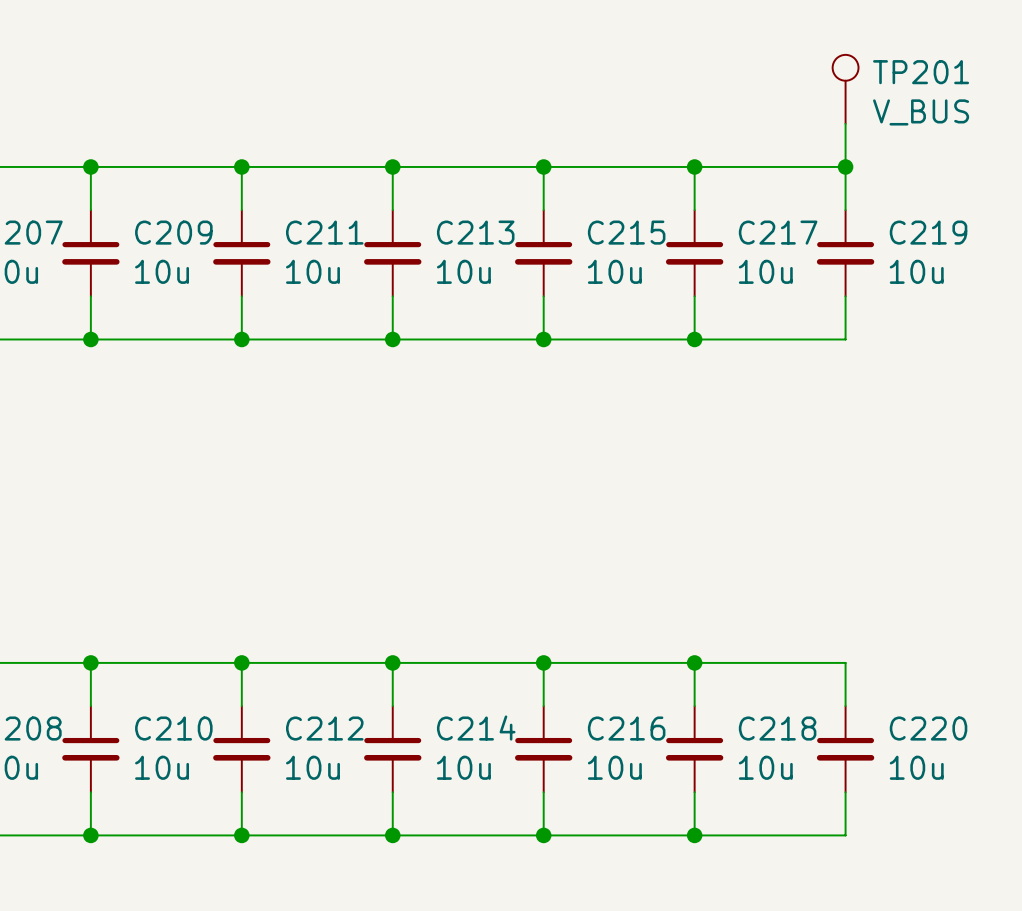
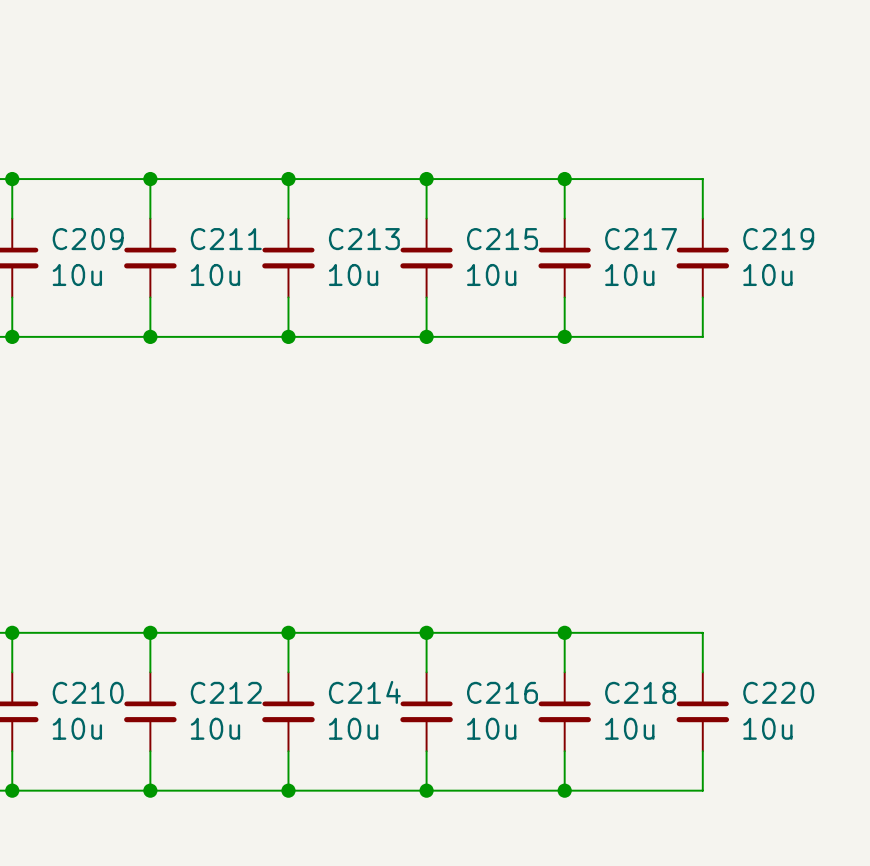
TP201: V_BUS (845, 89) -> none
wire: (845, 123) (845, 166) -> none
junction: (845, 166) -> none

